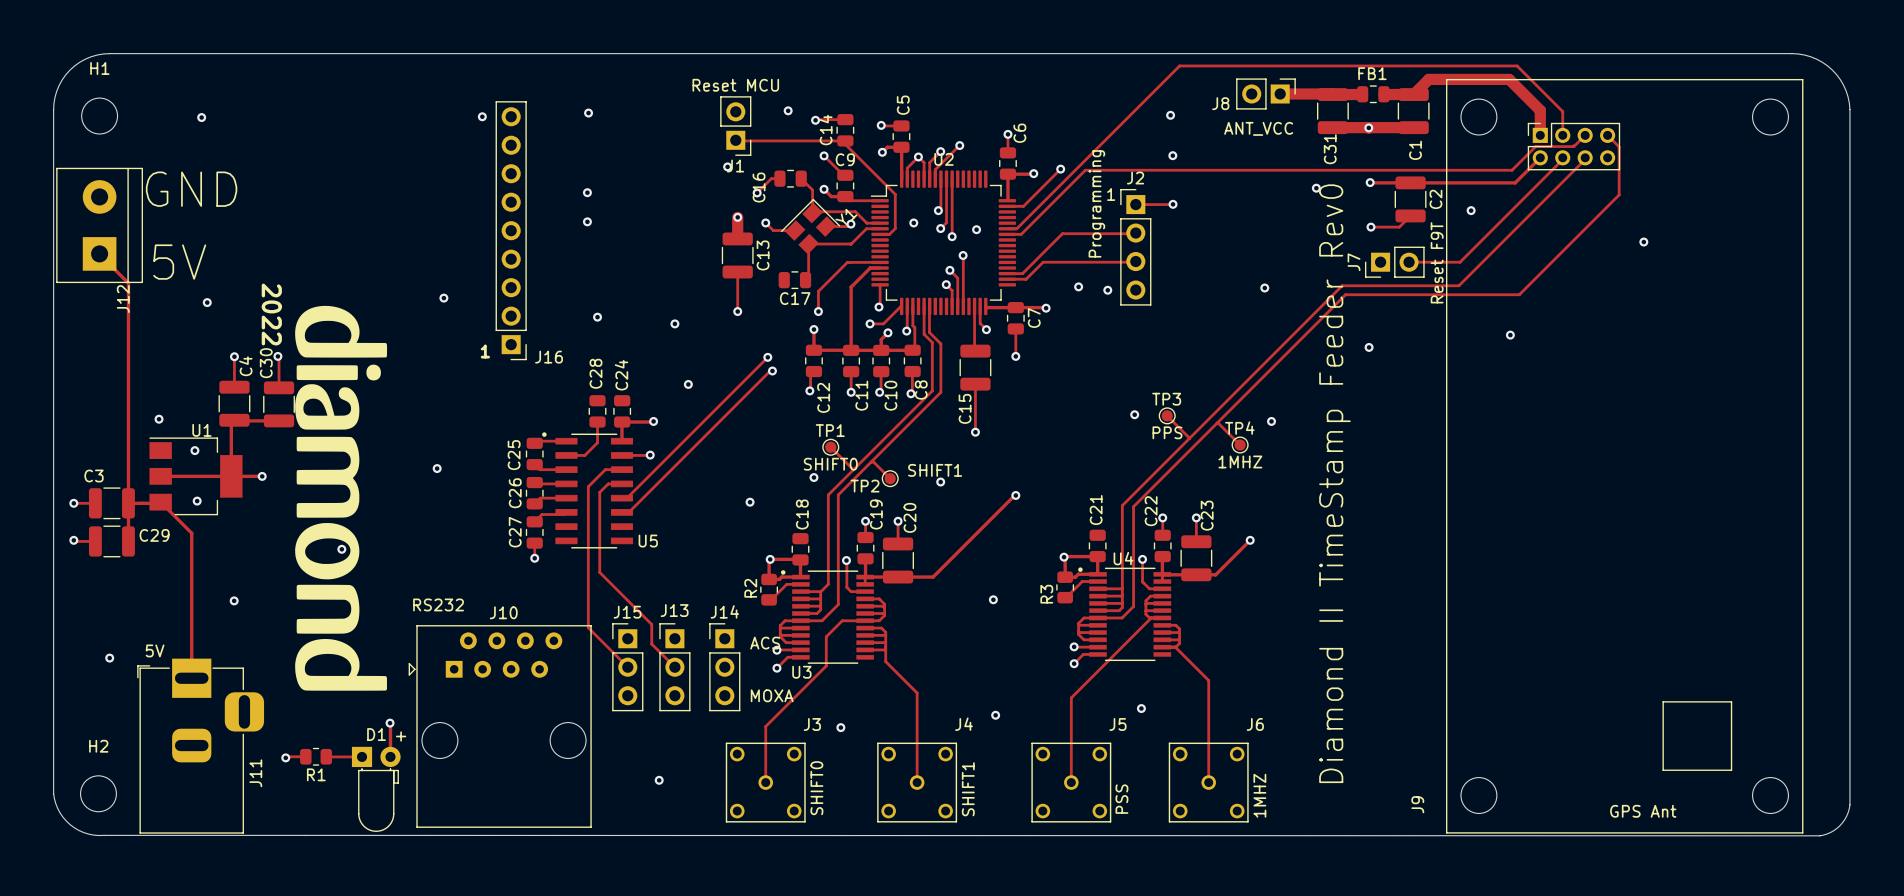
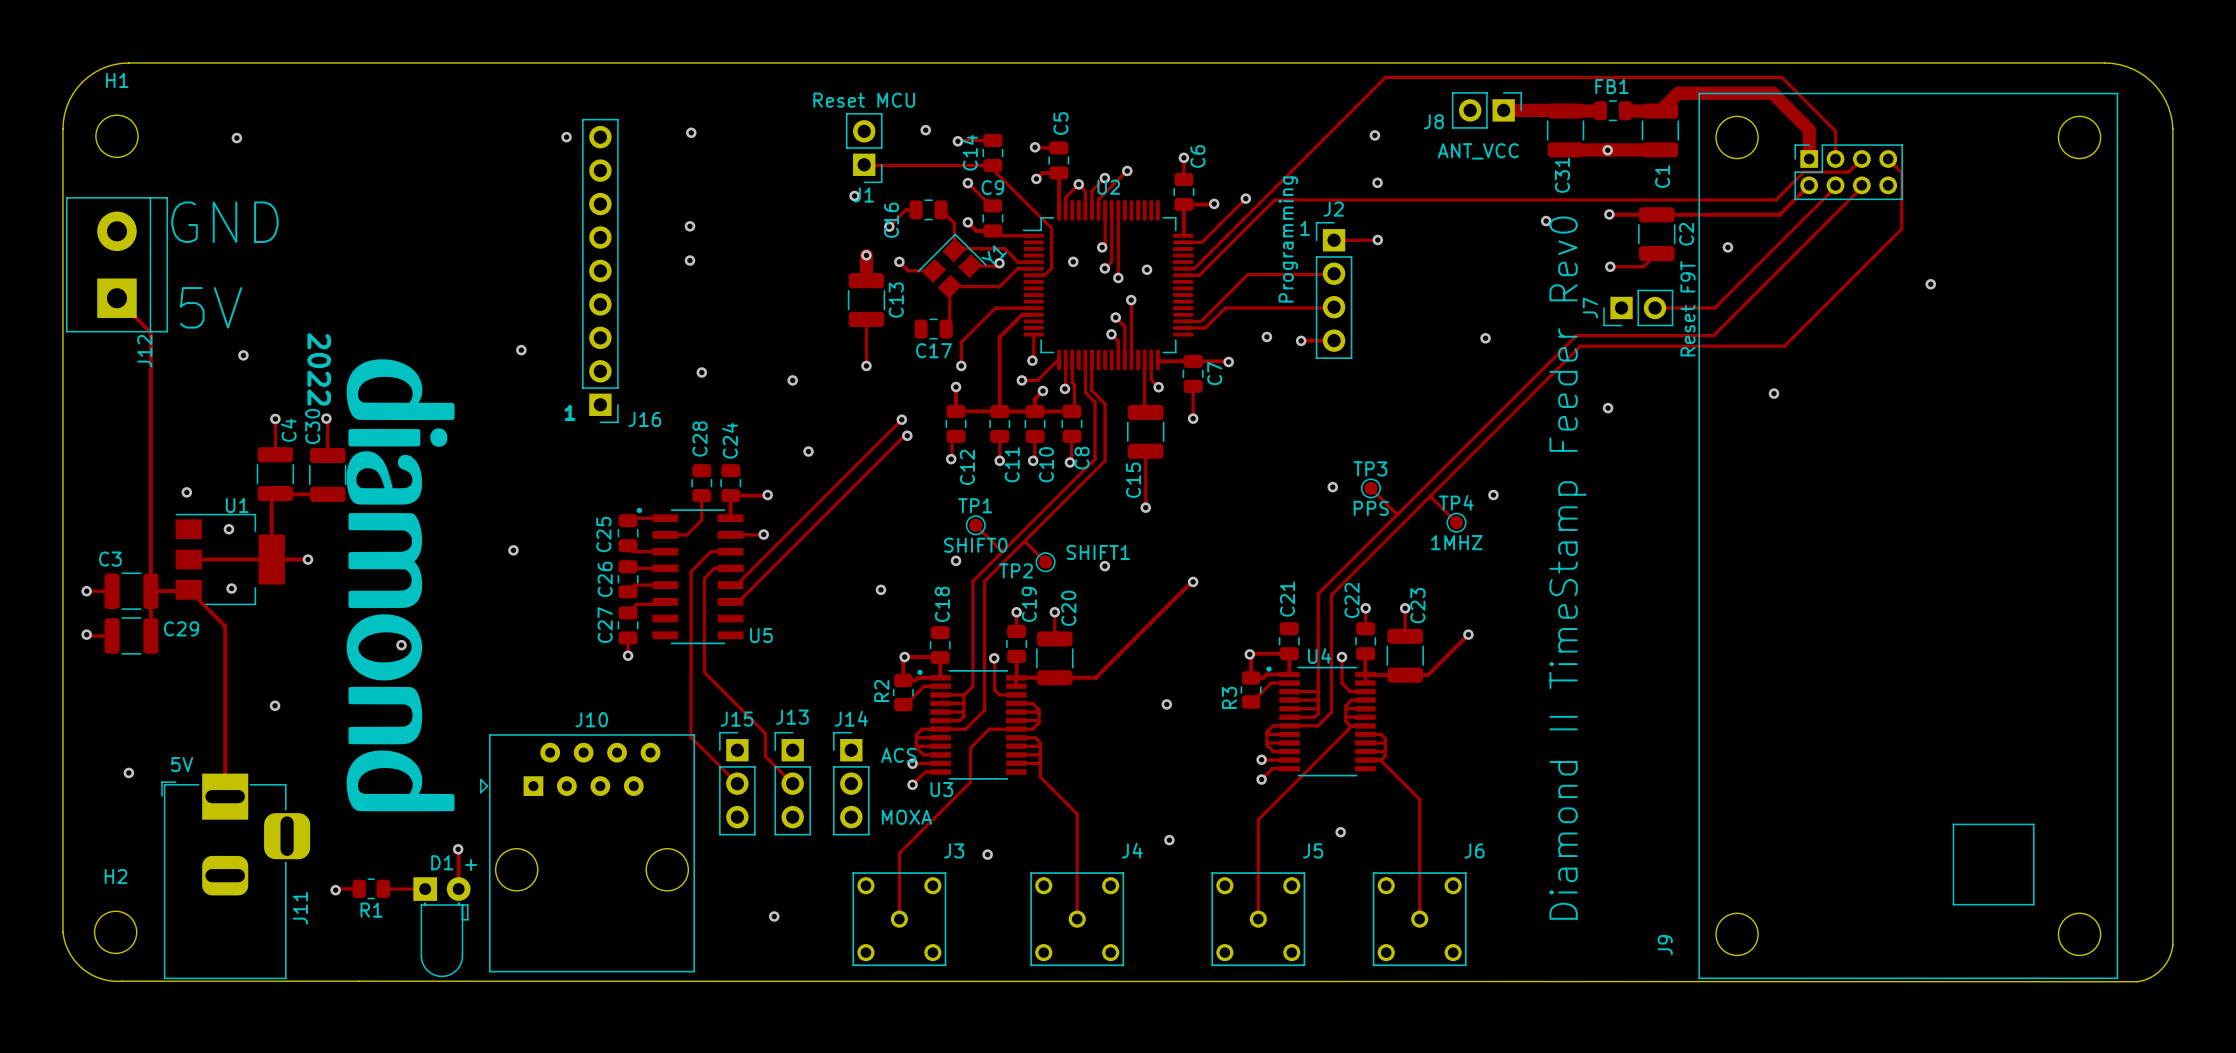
track: none -> (1334, 340) (1301, 340)
text: RS232 (438, 604) -> none
text: SHIFT0 (816, 788) -> none
text: SHIFT1 (968, 789) -> none
text: 1MHZ (1259, 795) -> none
text: PSS (1121, 799) -> none
text: GPS Ant (1643, 811) -> none

